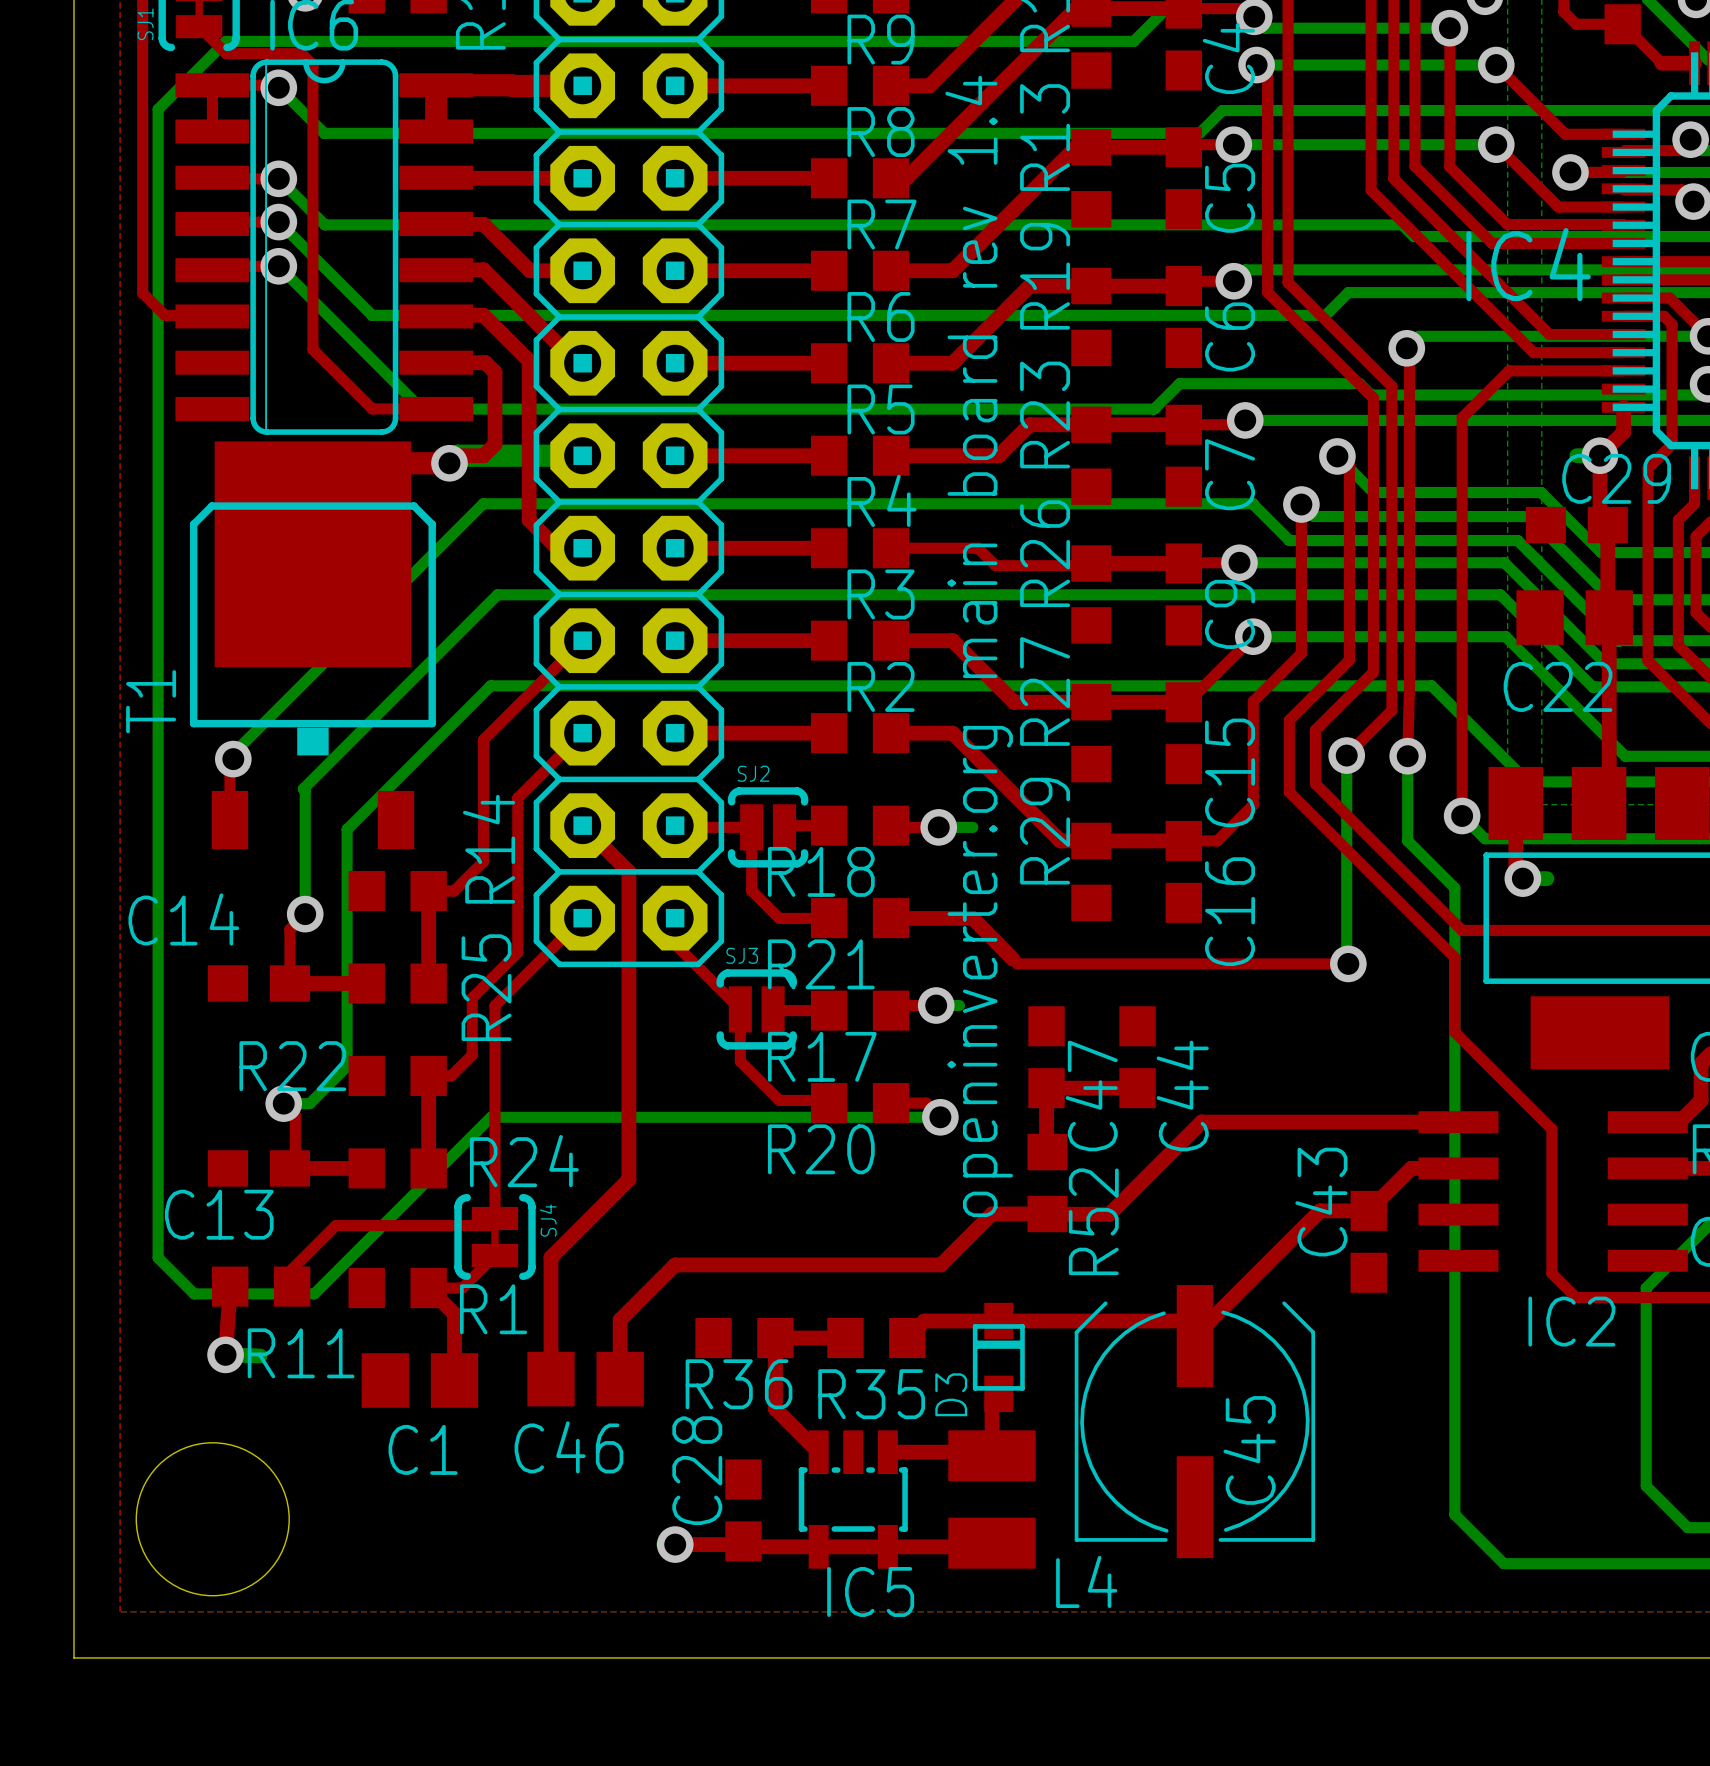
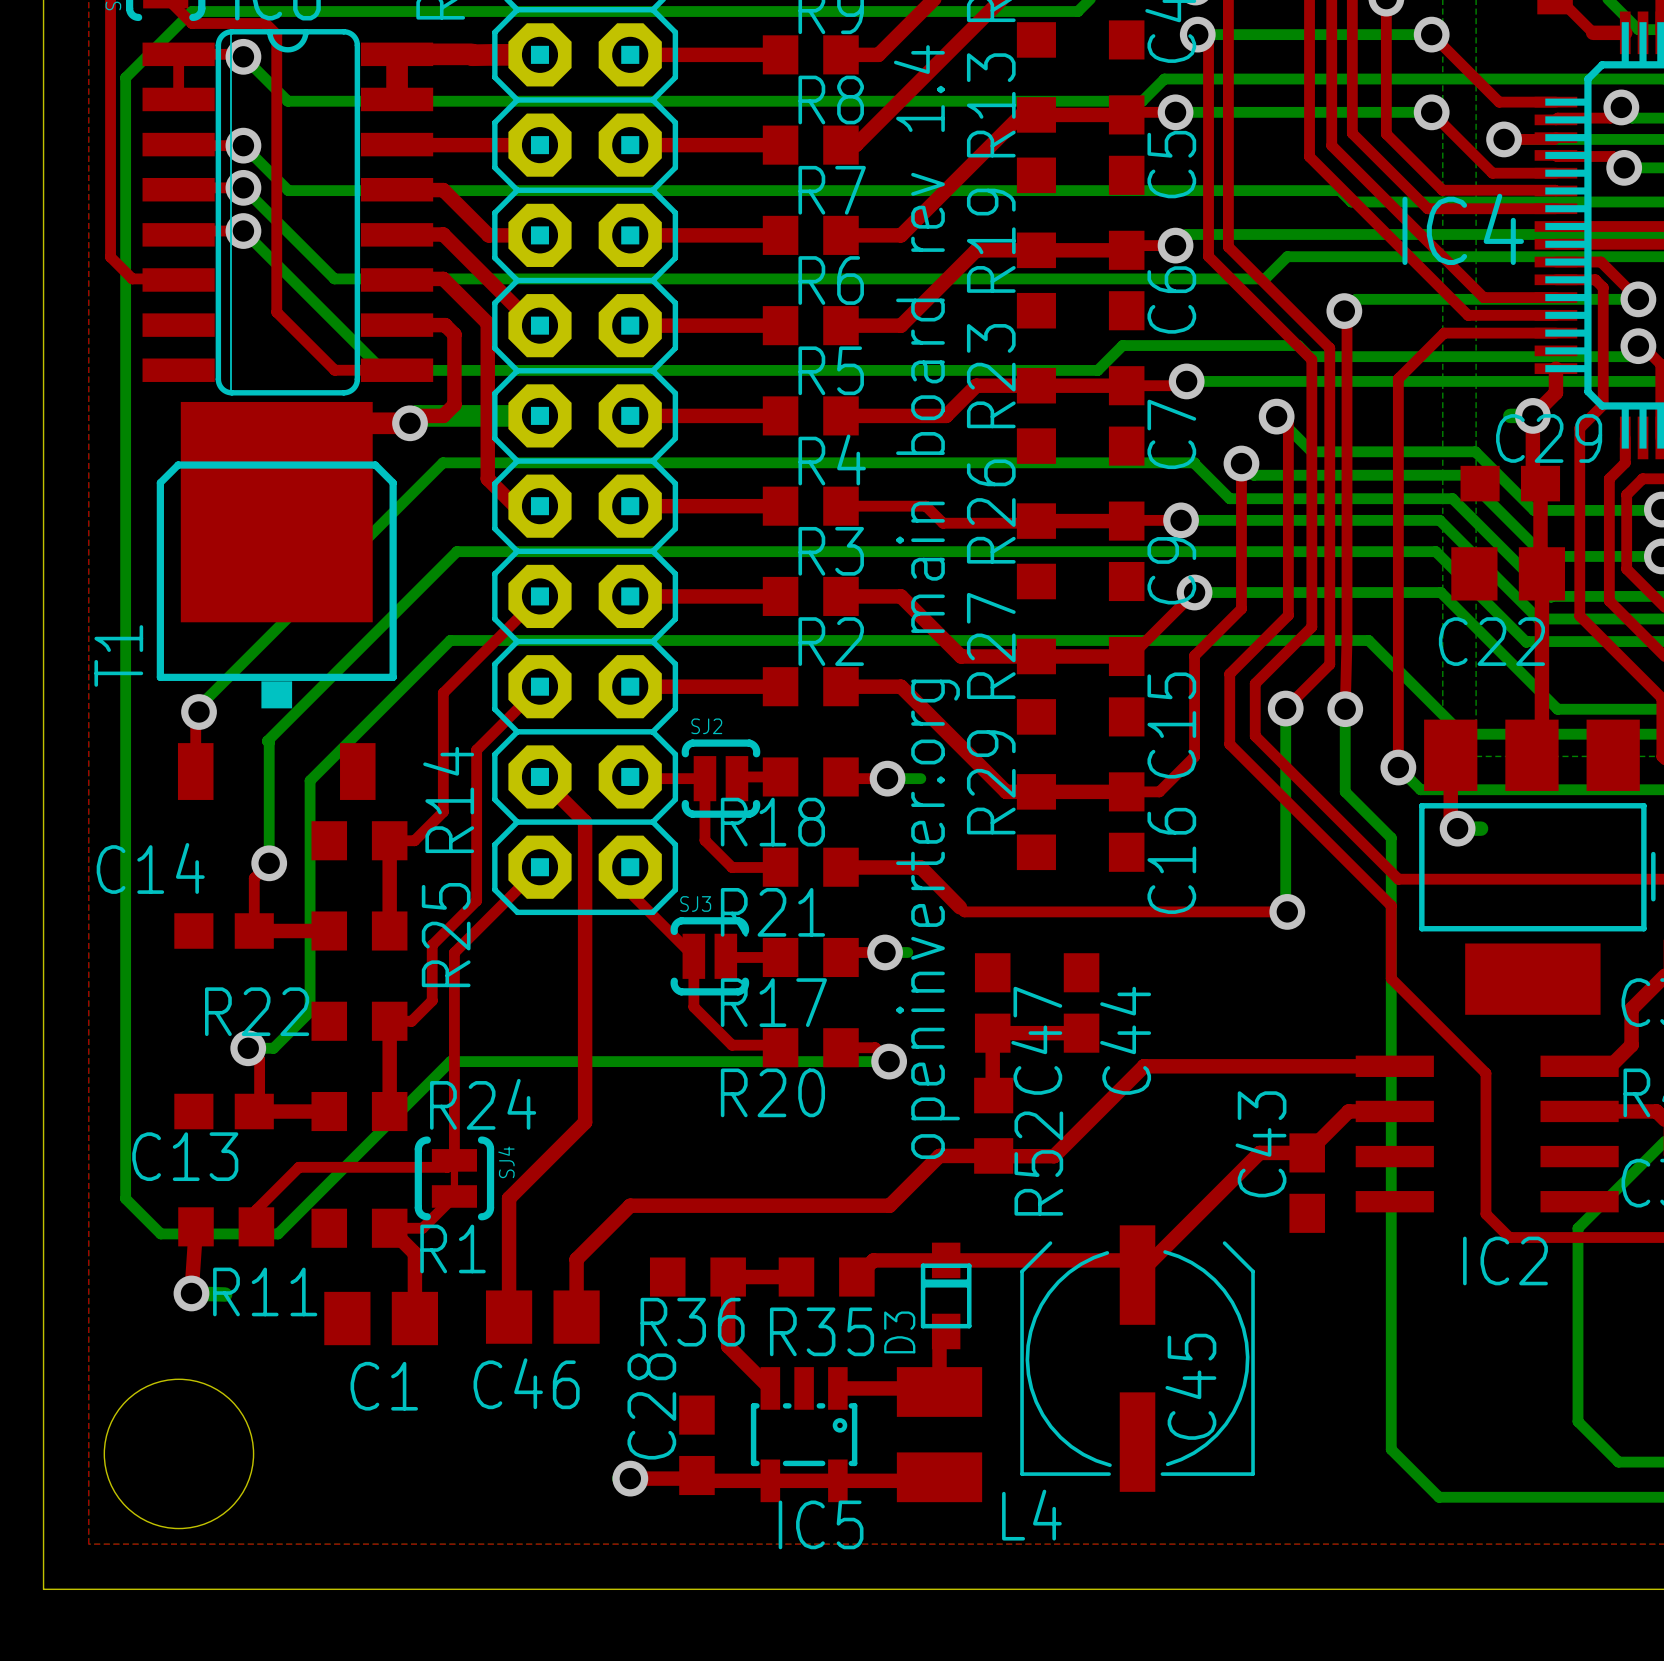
IC5 footprint: [798, 1430, 908, 1569] -> [750, 1367, 858, 1503]

